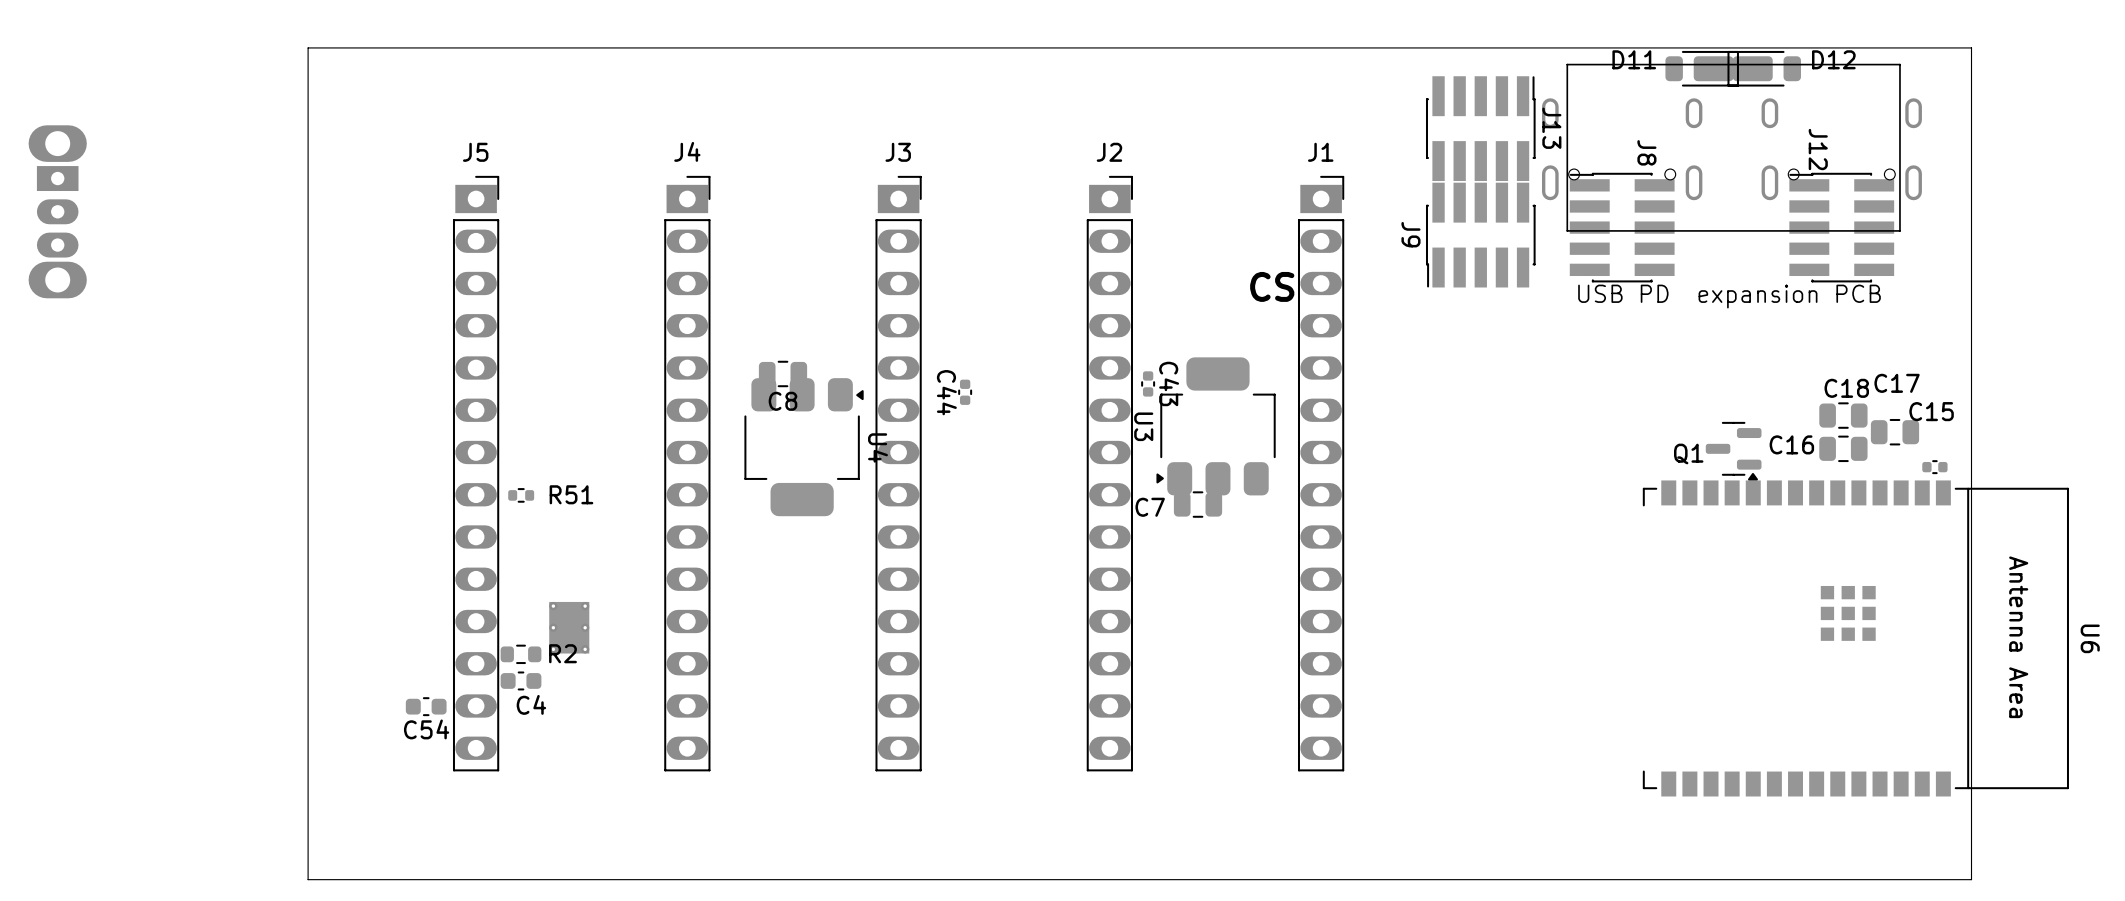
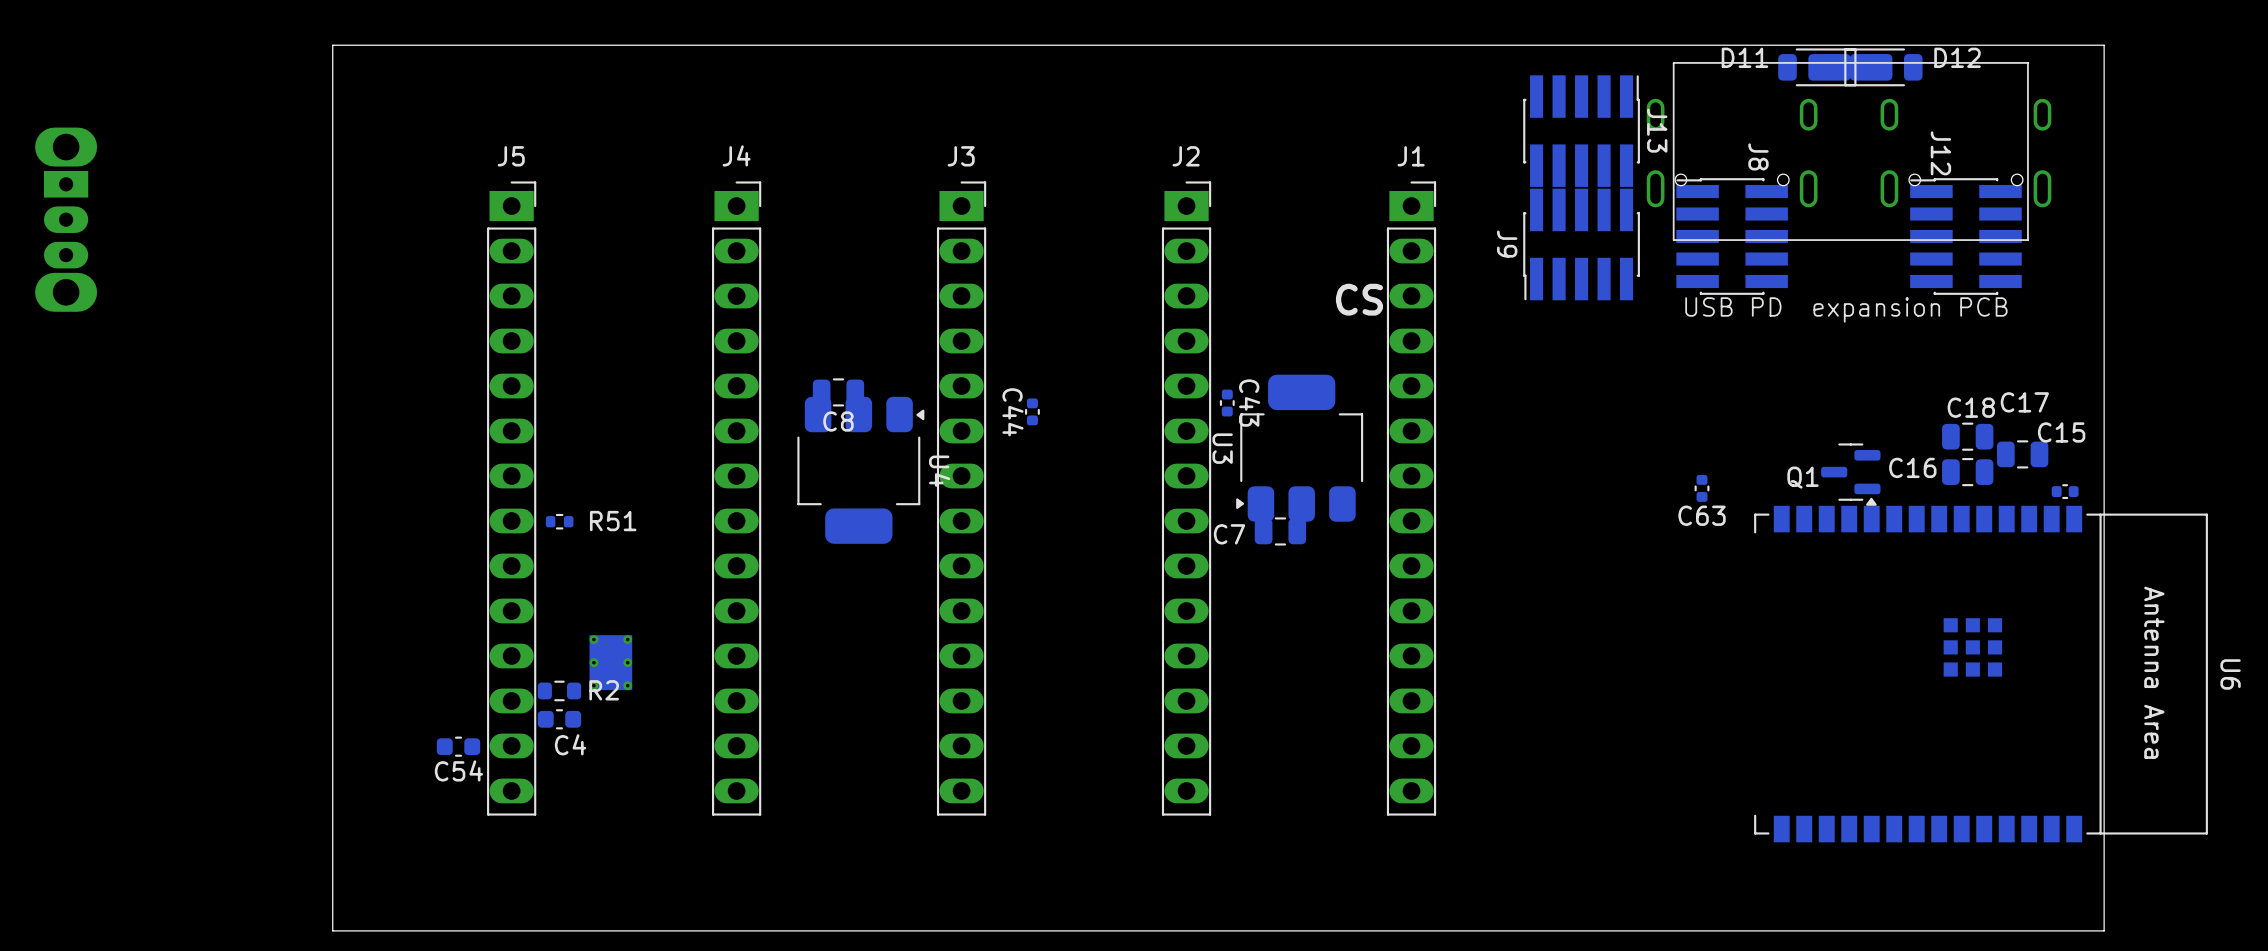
C63: none -> (1702, 488)

